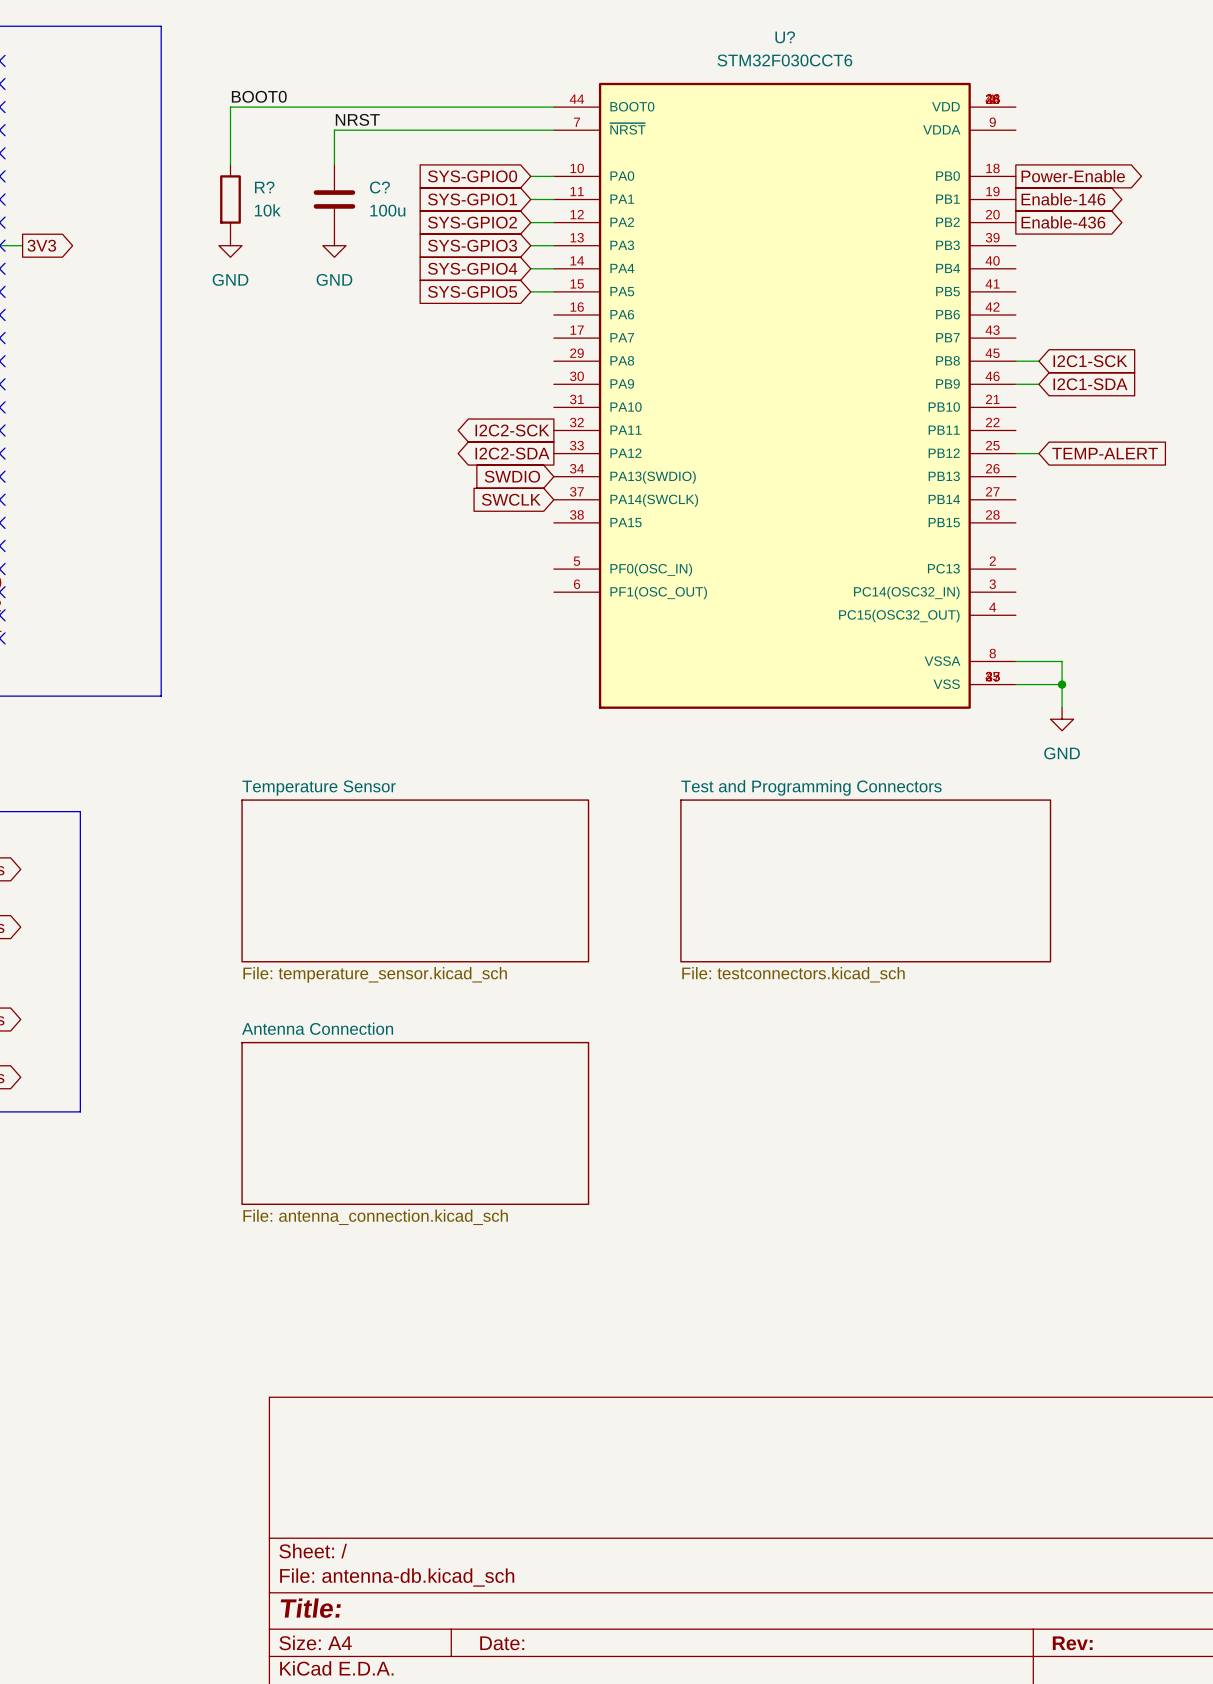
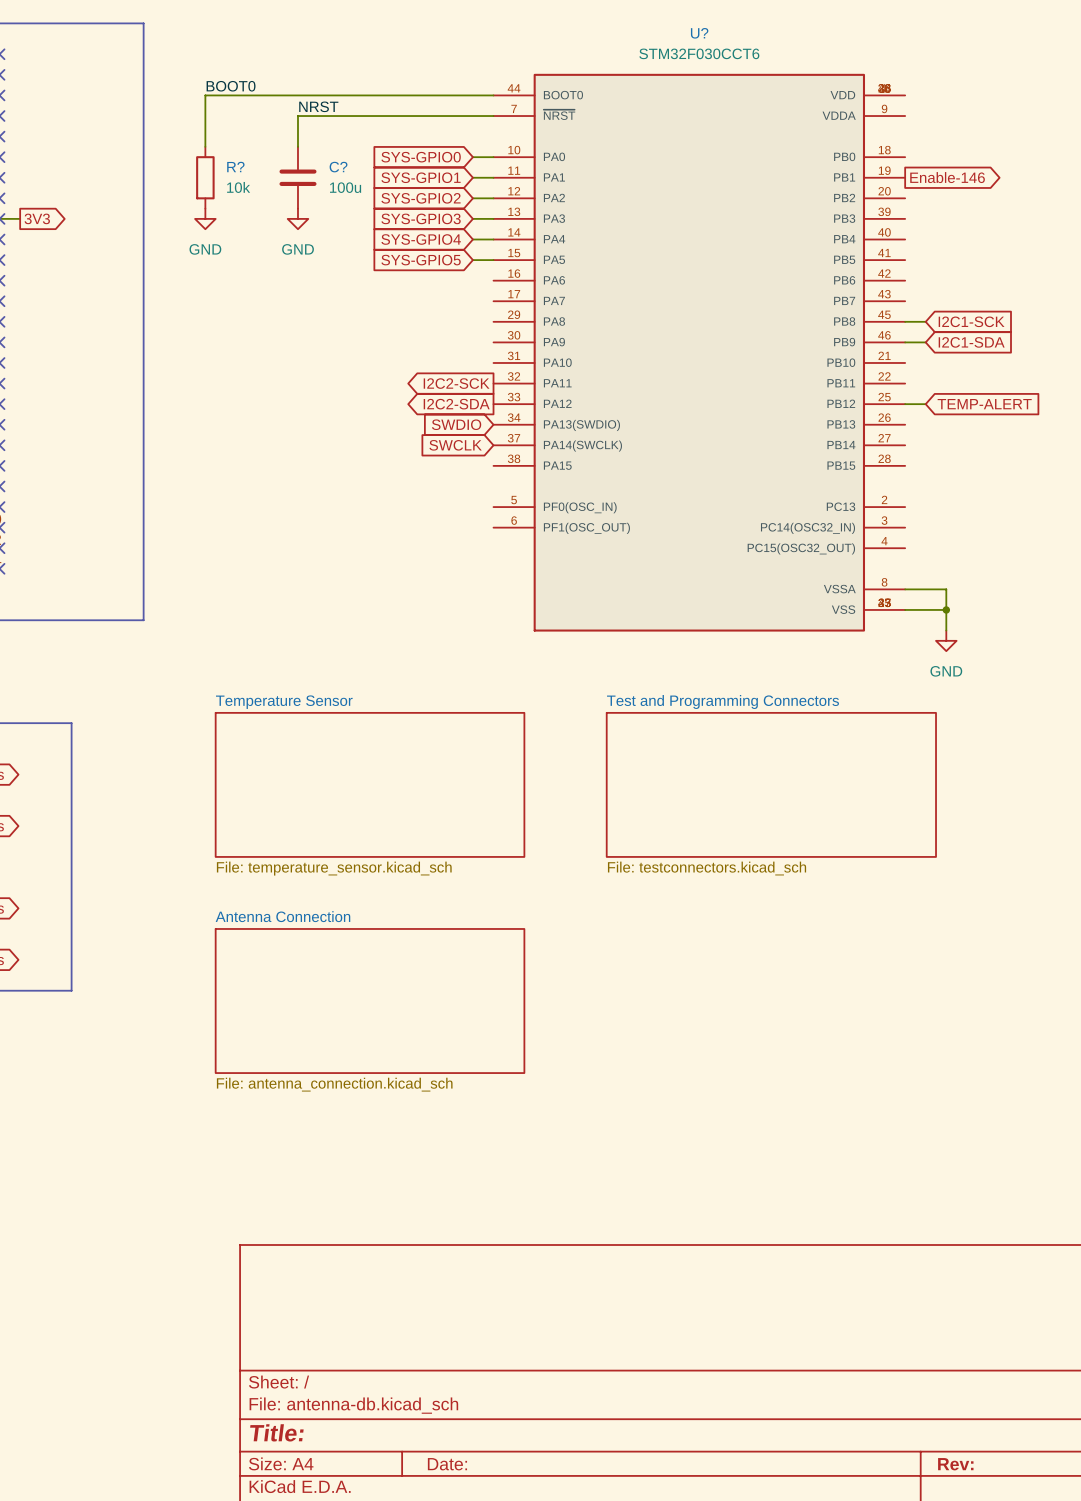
global label: Power-Enable (1073, 176) -> none
global label: Enable-436 (1063, 222) -> none

